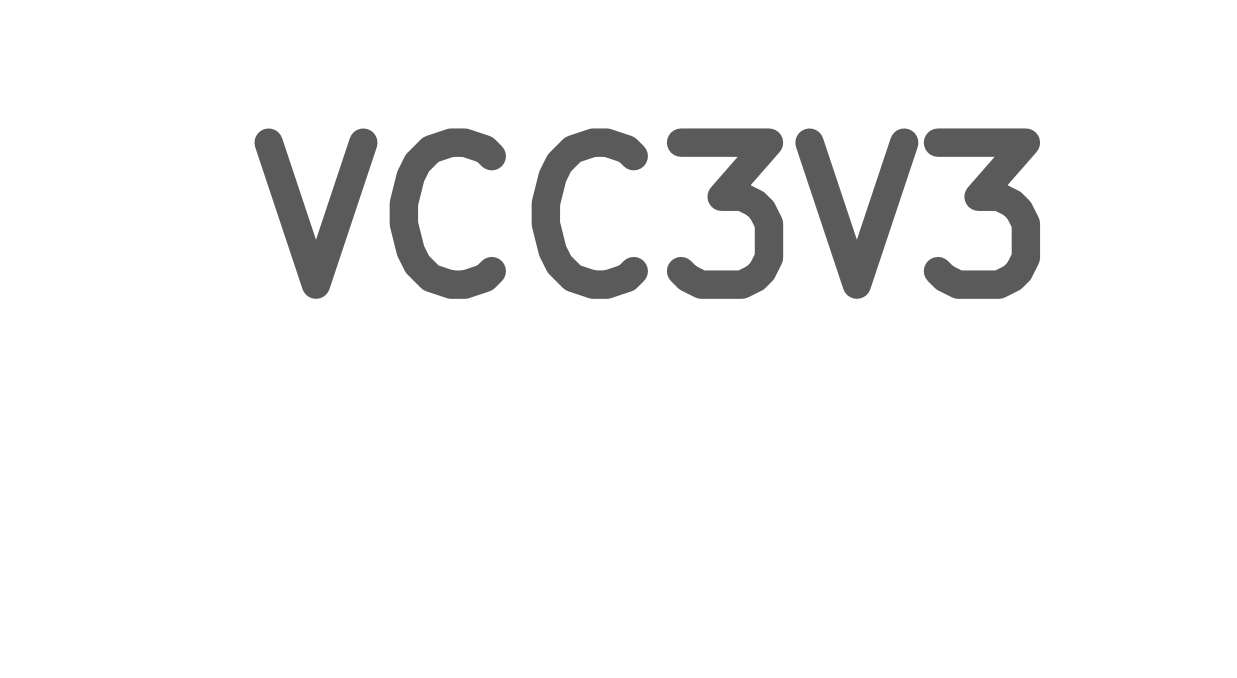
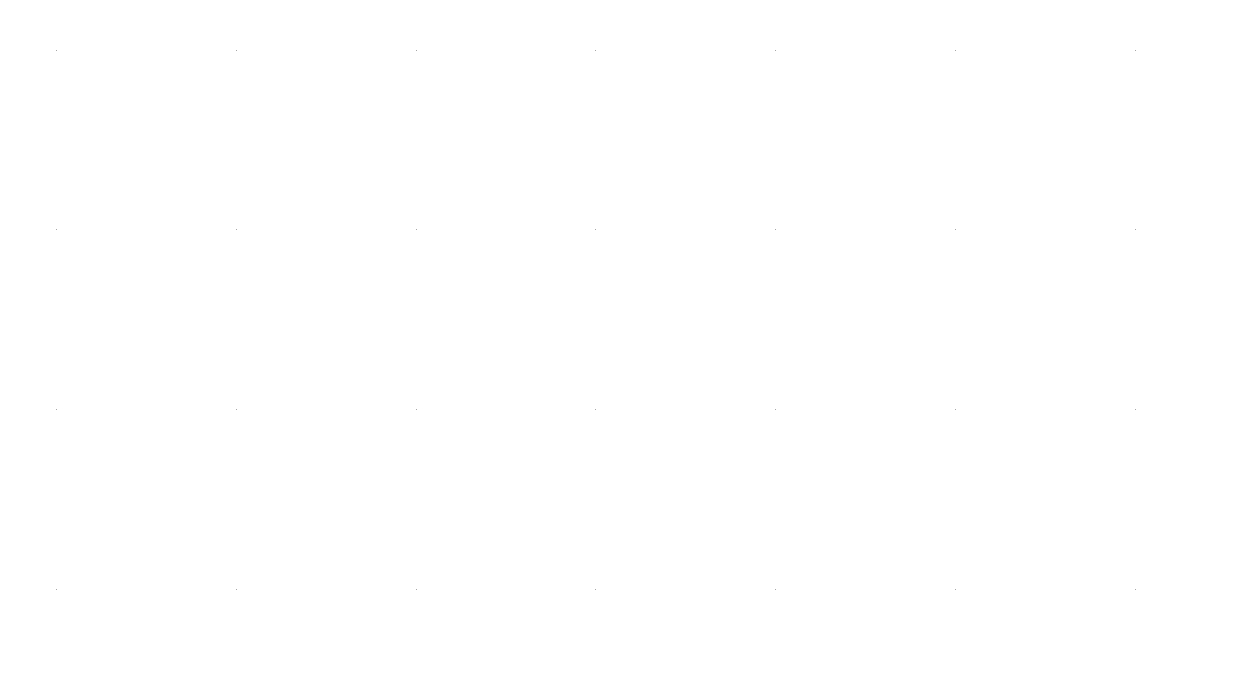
text: VCC3V3 (647, 213) -> none

